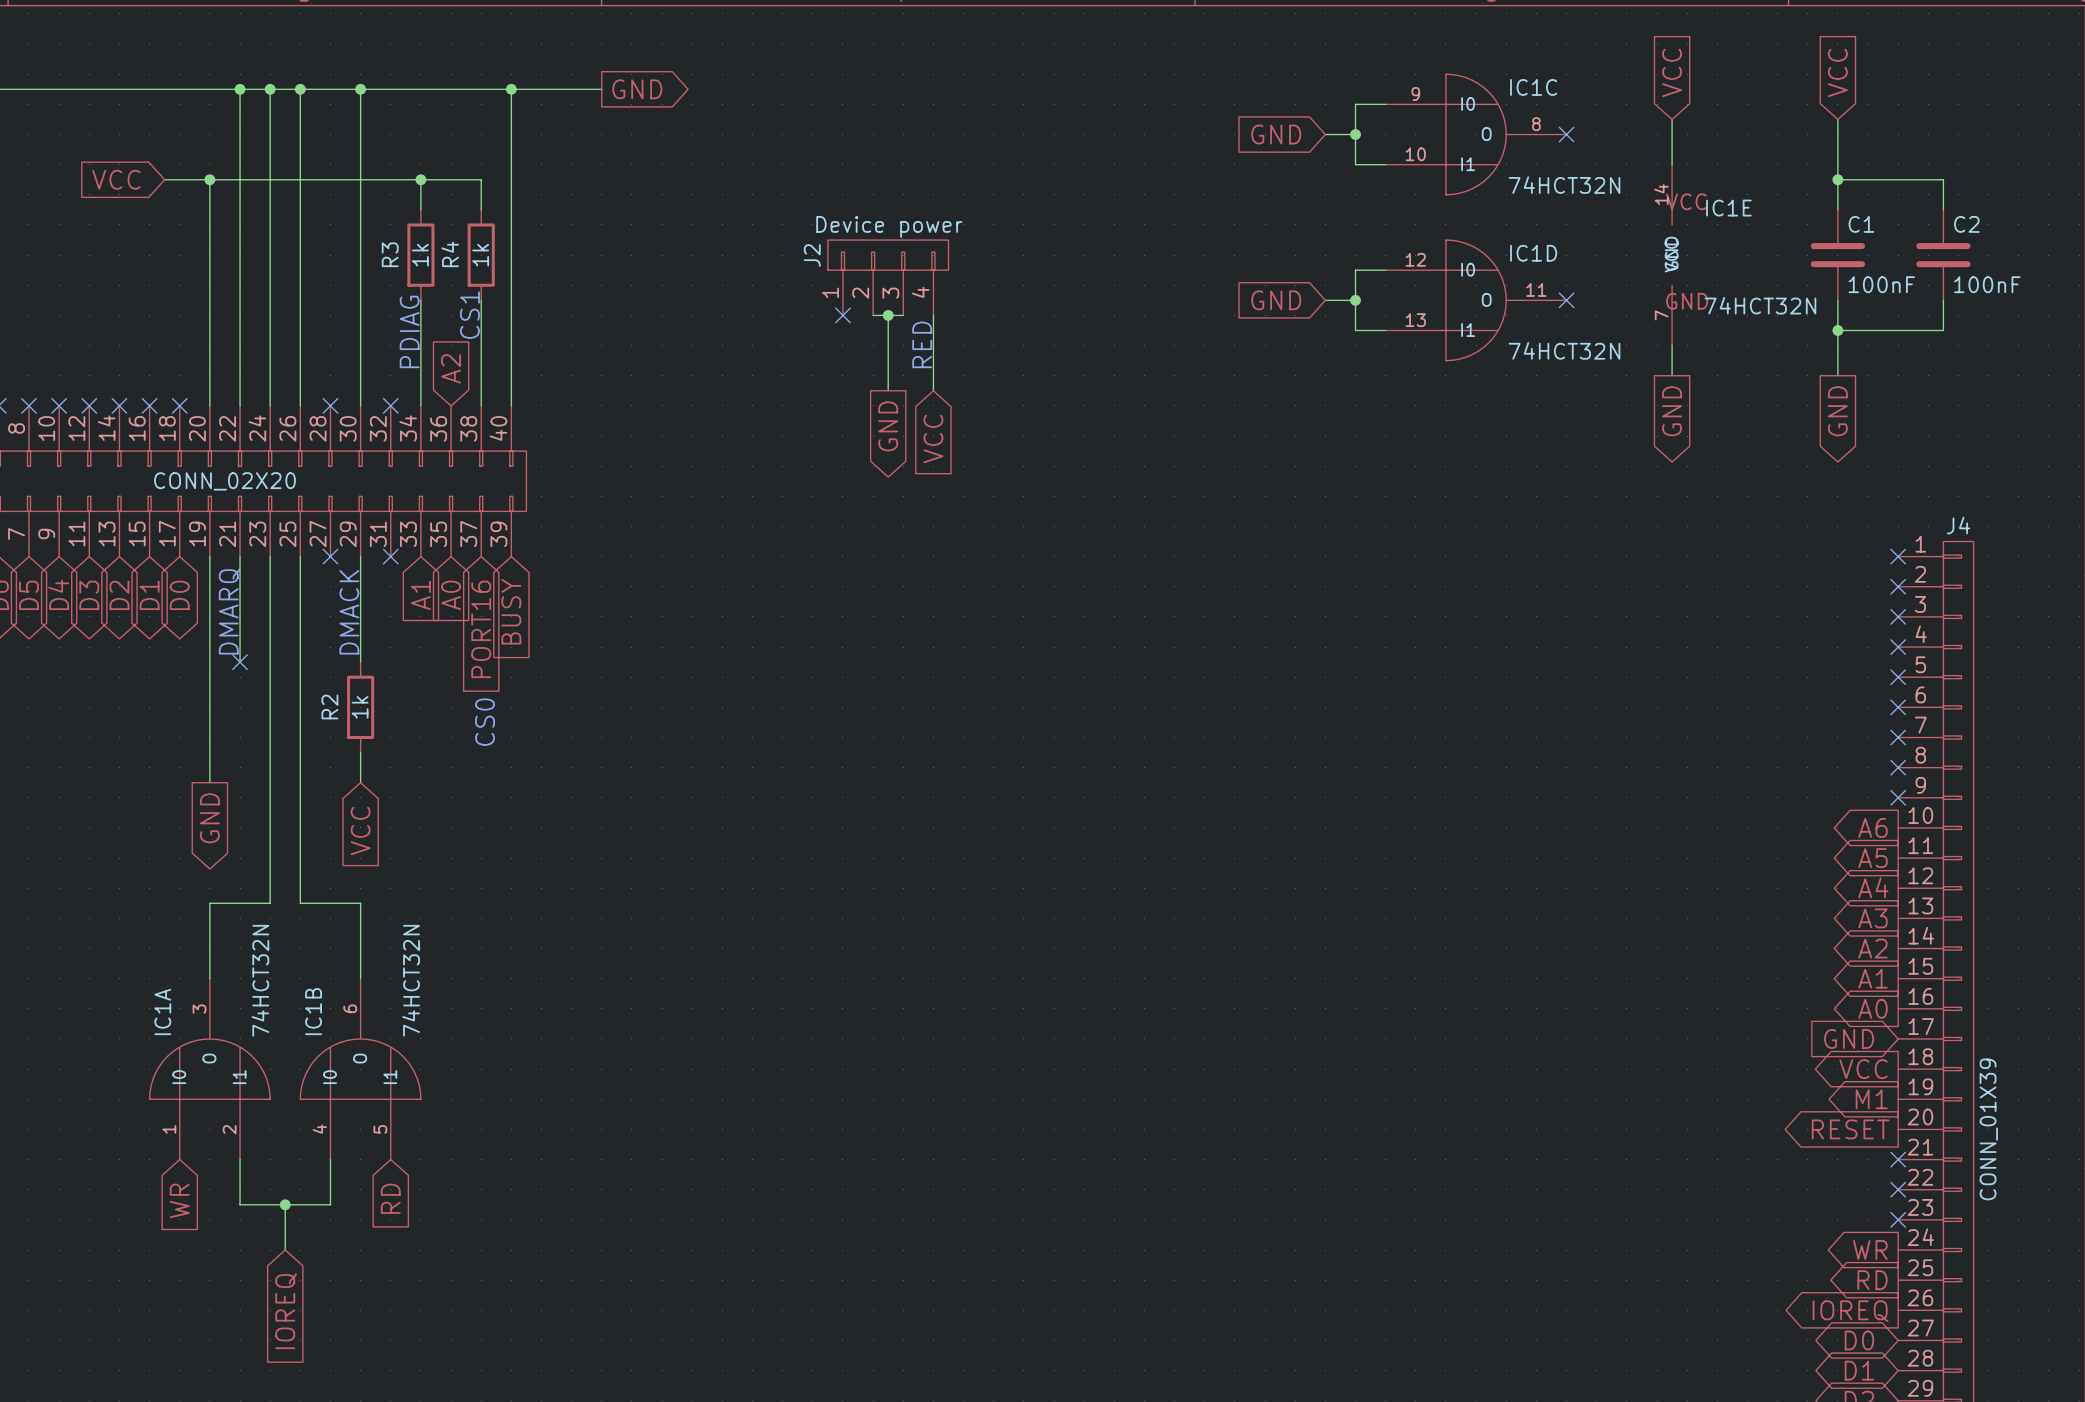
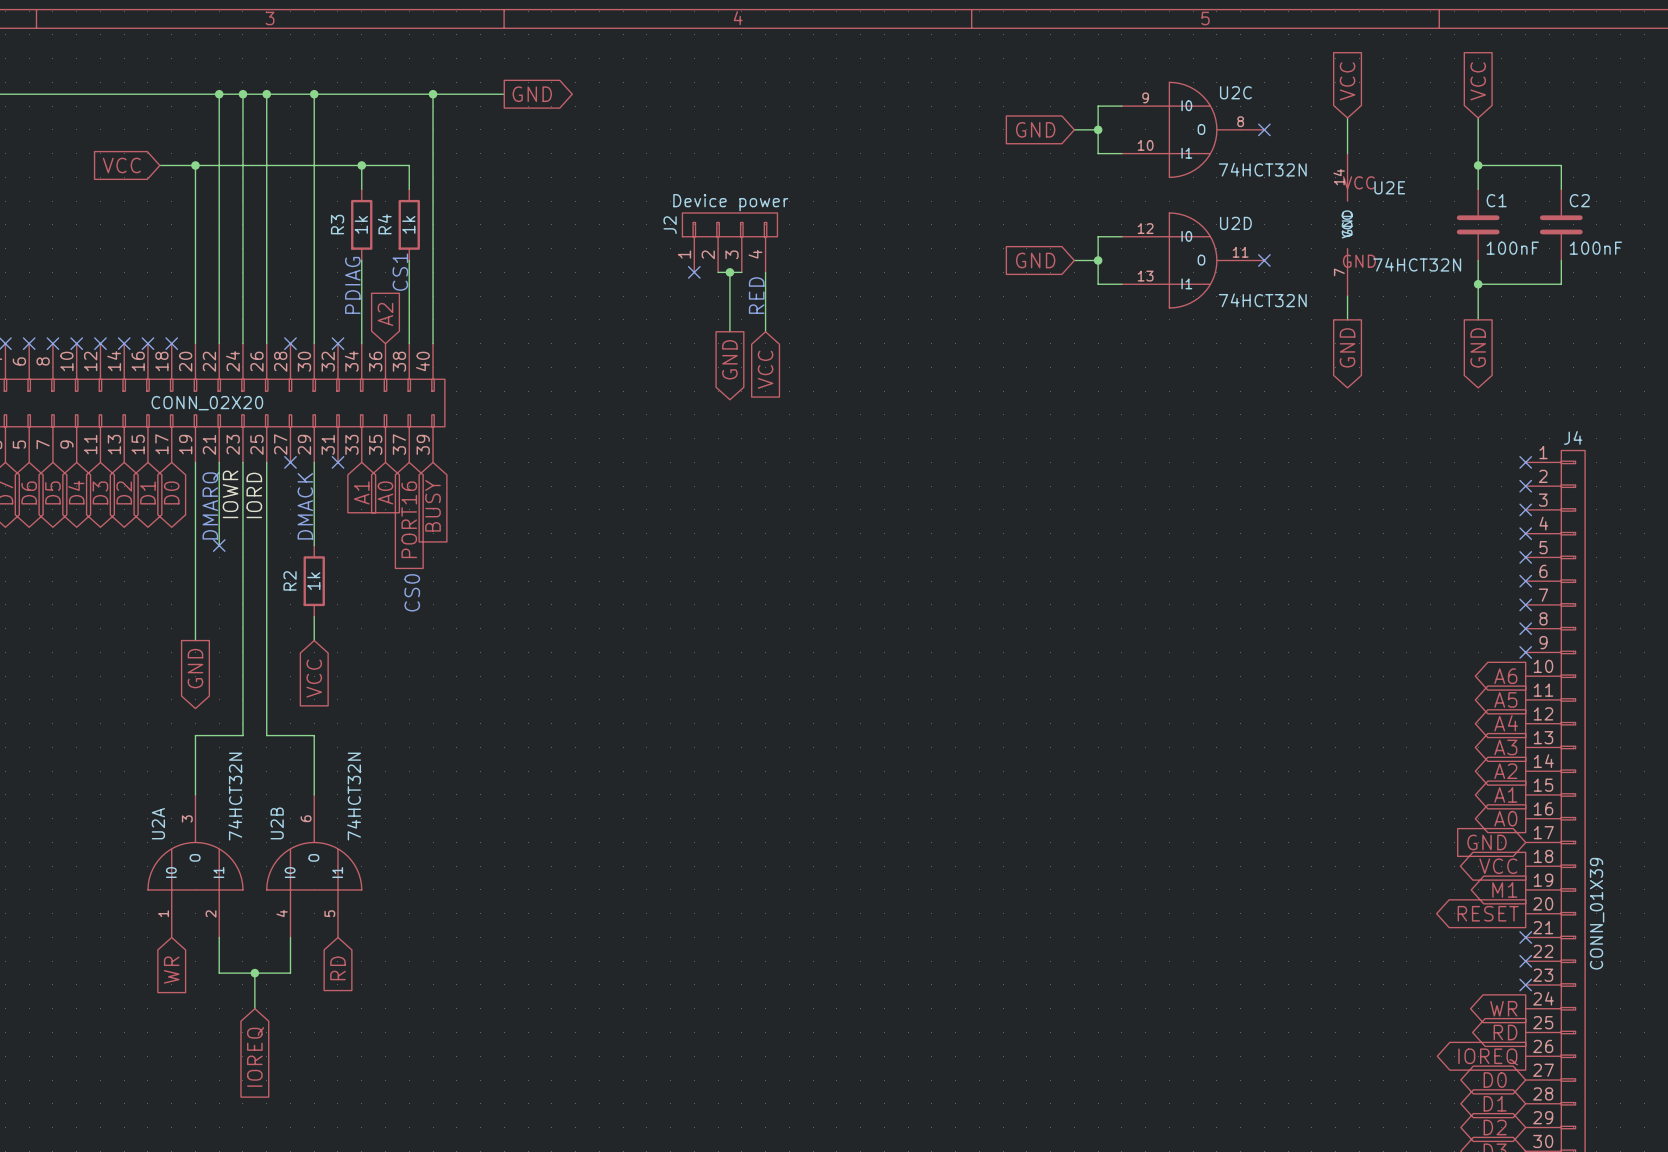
IC1C name: IC1C (1533, 87) -> U2C (1235, 92)
IC1E name: IC1E (1728, 208) -> U2E (1389, 187)
IC1D name: IC1D (1533, 253) -> U2D (1235, 223)
label: none -> IOWR (230, 494)
label: none -> IORD (254, 495)
IC1A name: IC1A (162, 1011) -> U2A (158, 823)
IC1B name: IC1B (313, 1011) -> U2B (277, 823)

